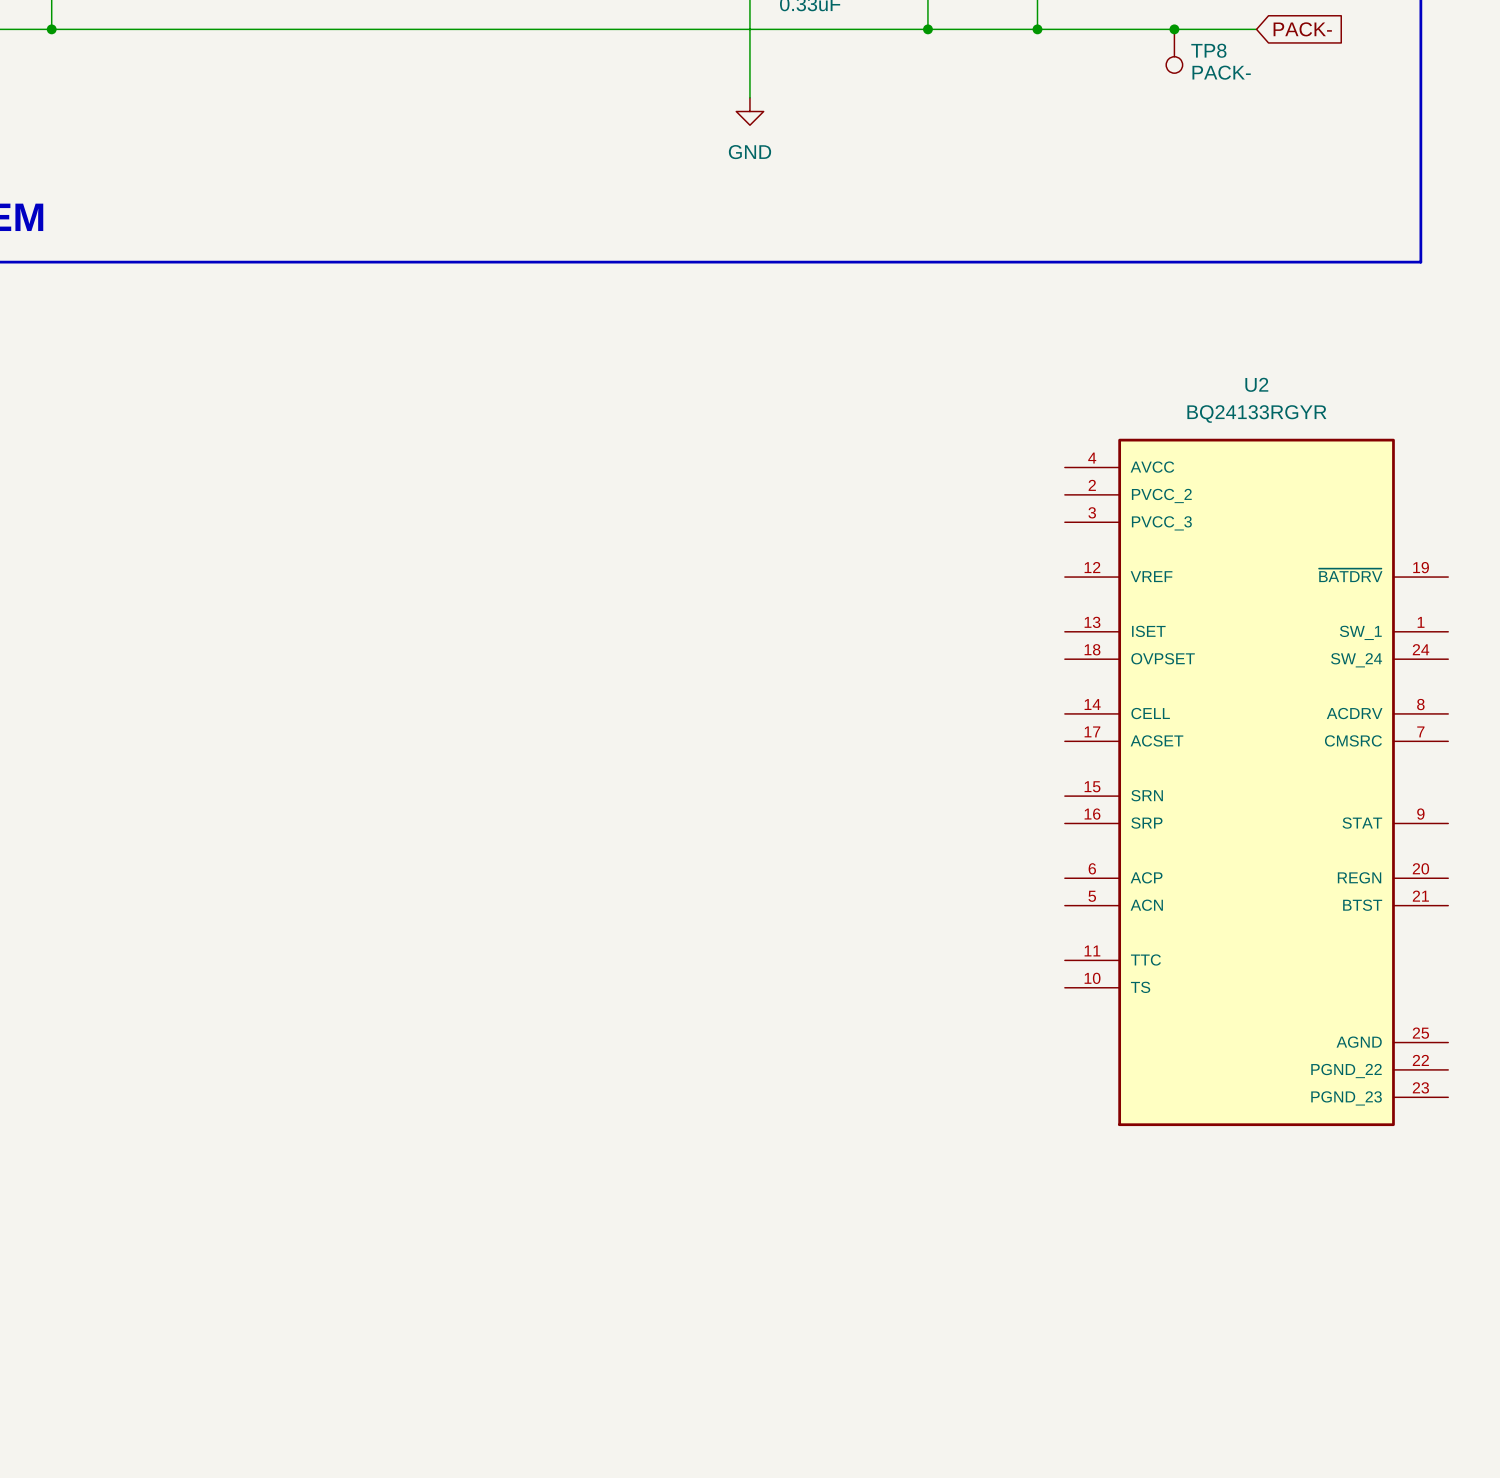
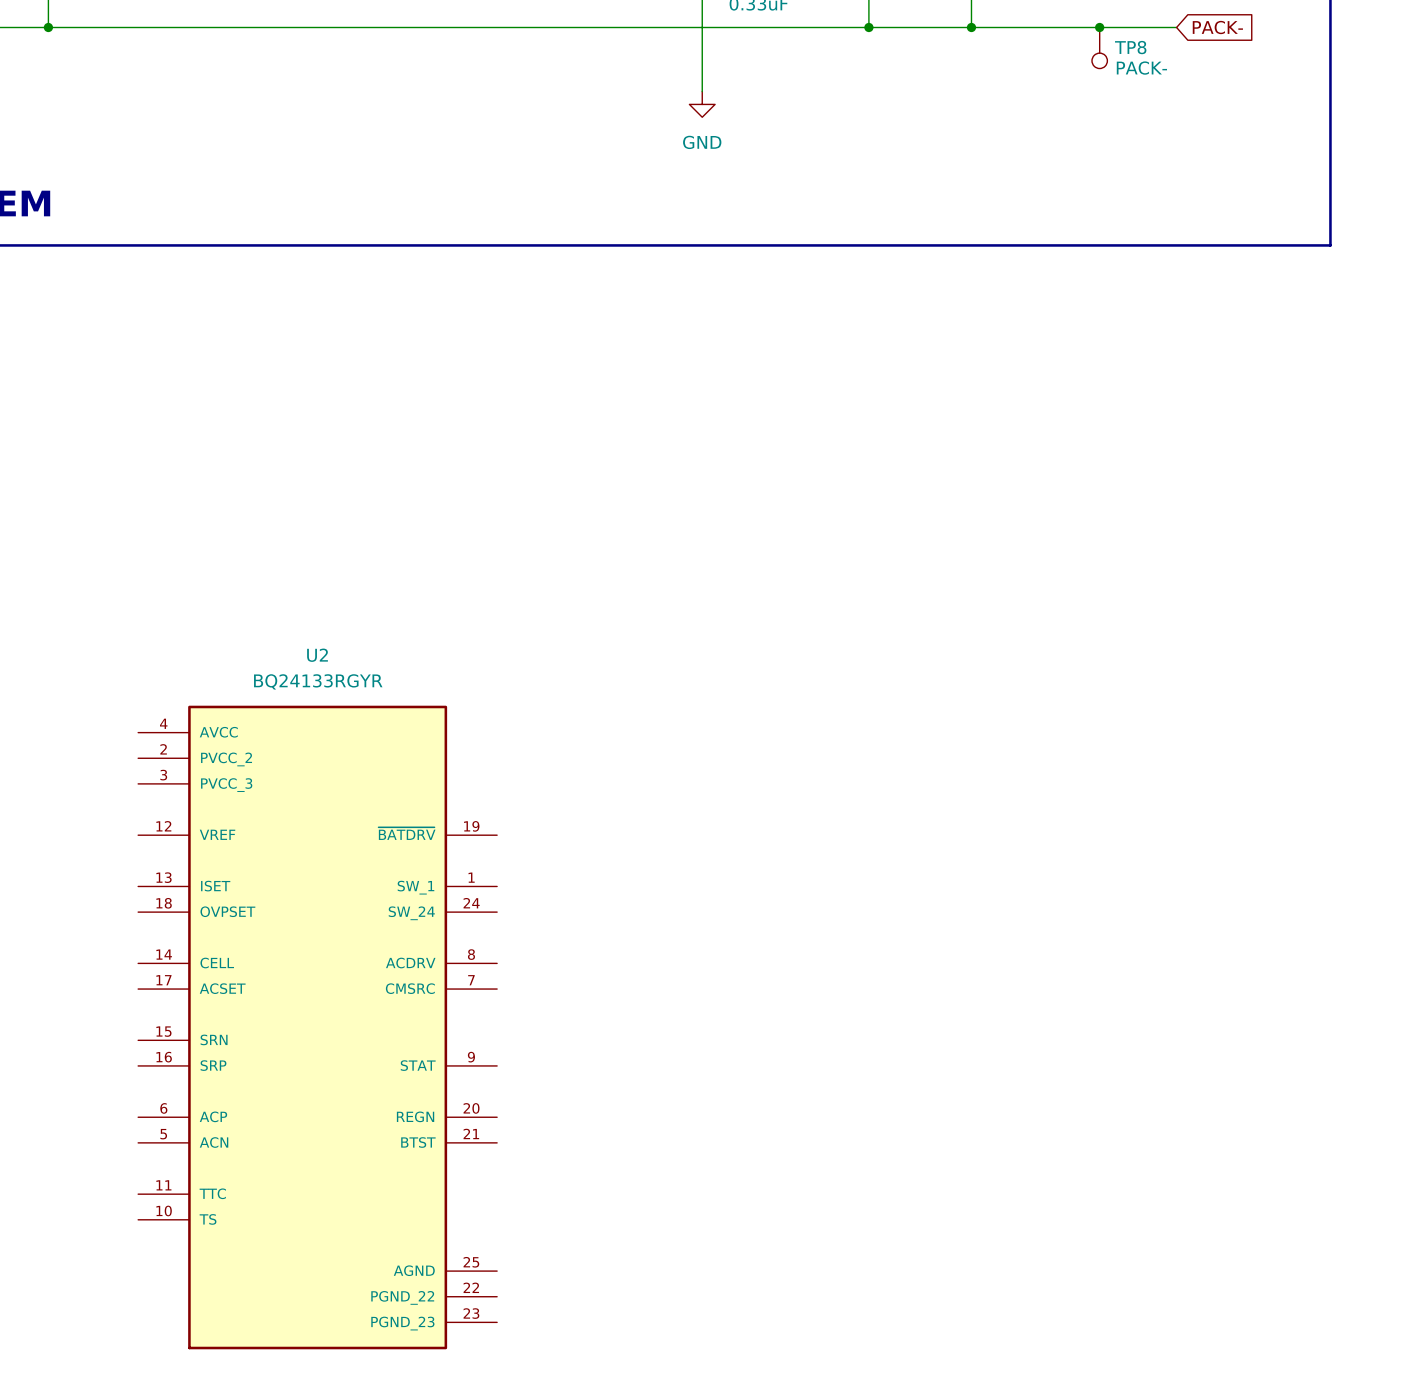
U2 position: (1256, 782) -> (317, 1027)

